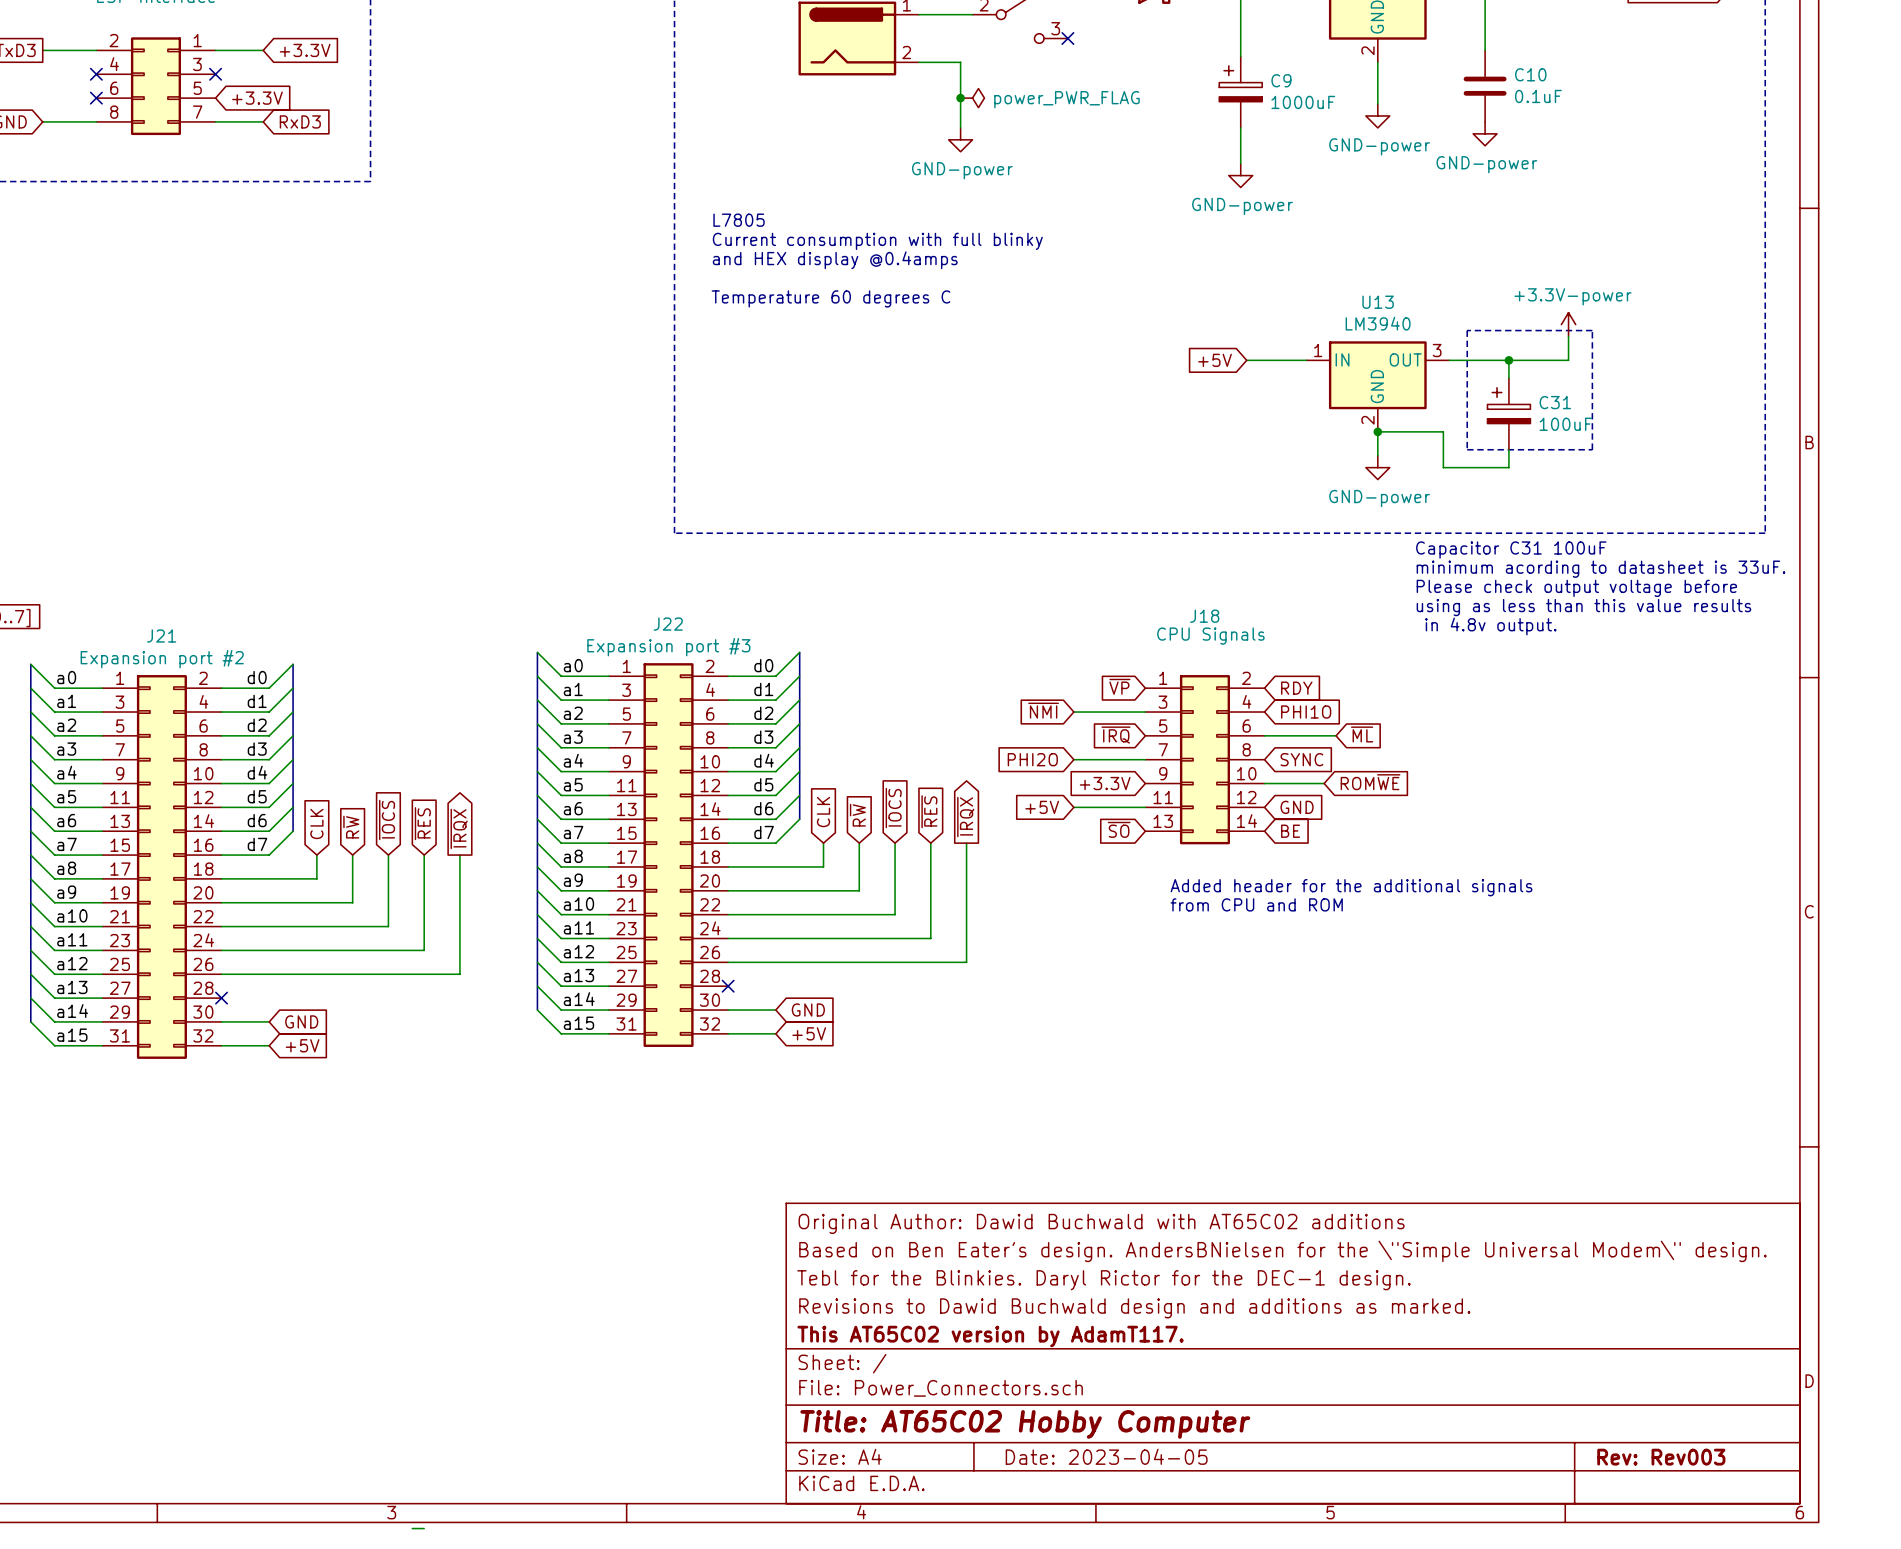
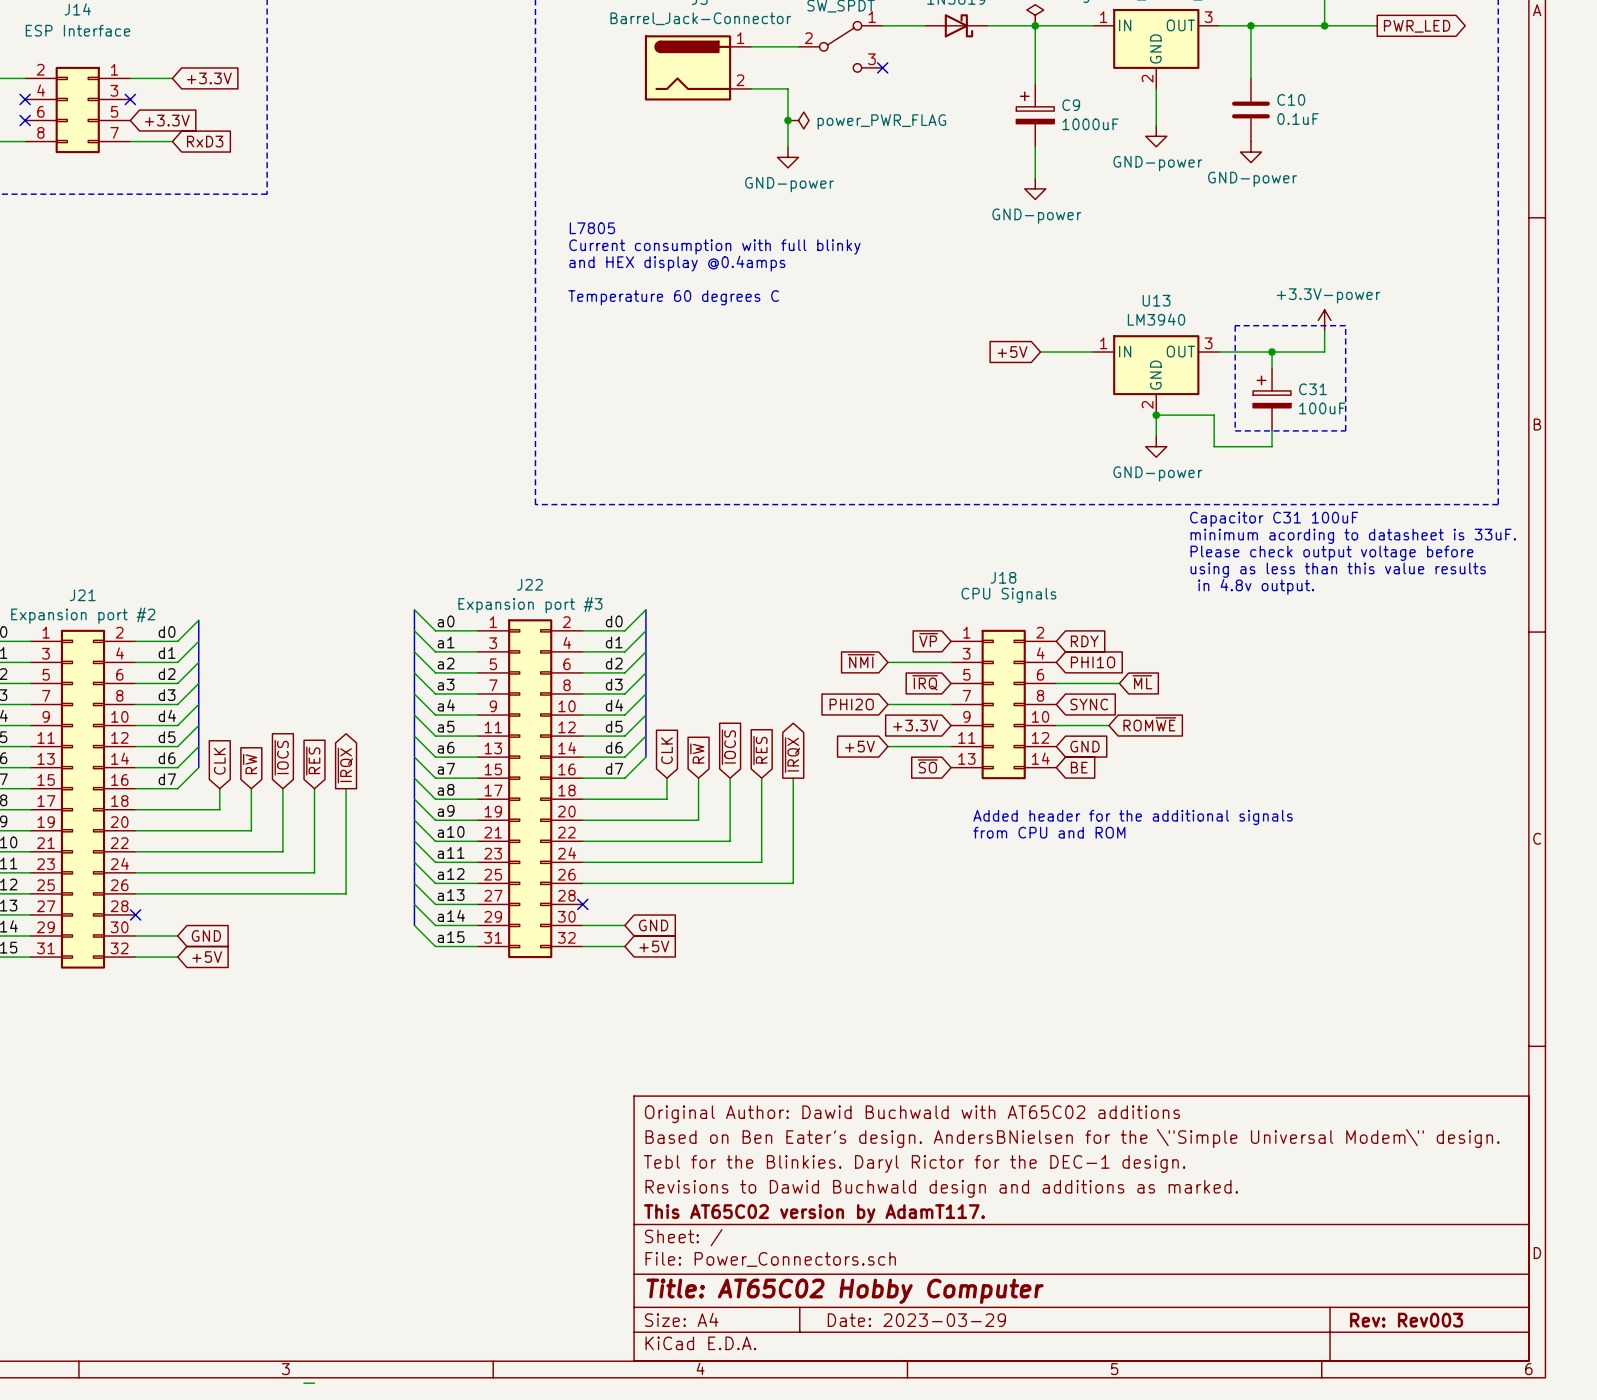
title block: Date: 2023-04-05 (1106, 1456) -> Date: 2023-03-29 (916, 1320)

